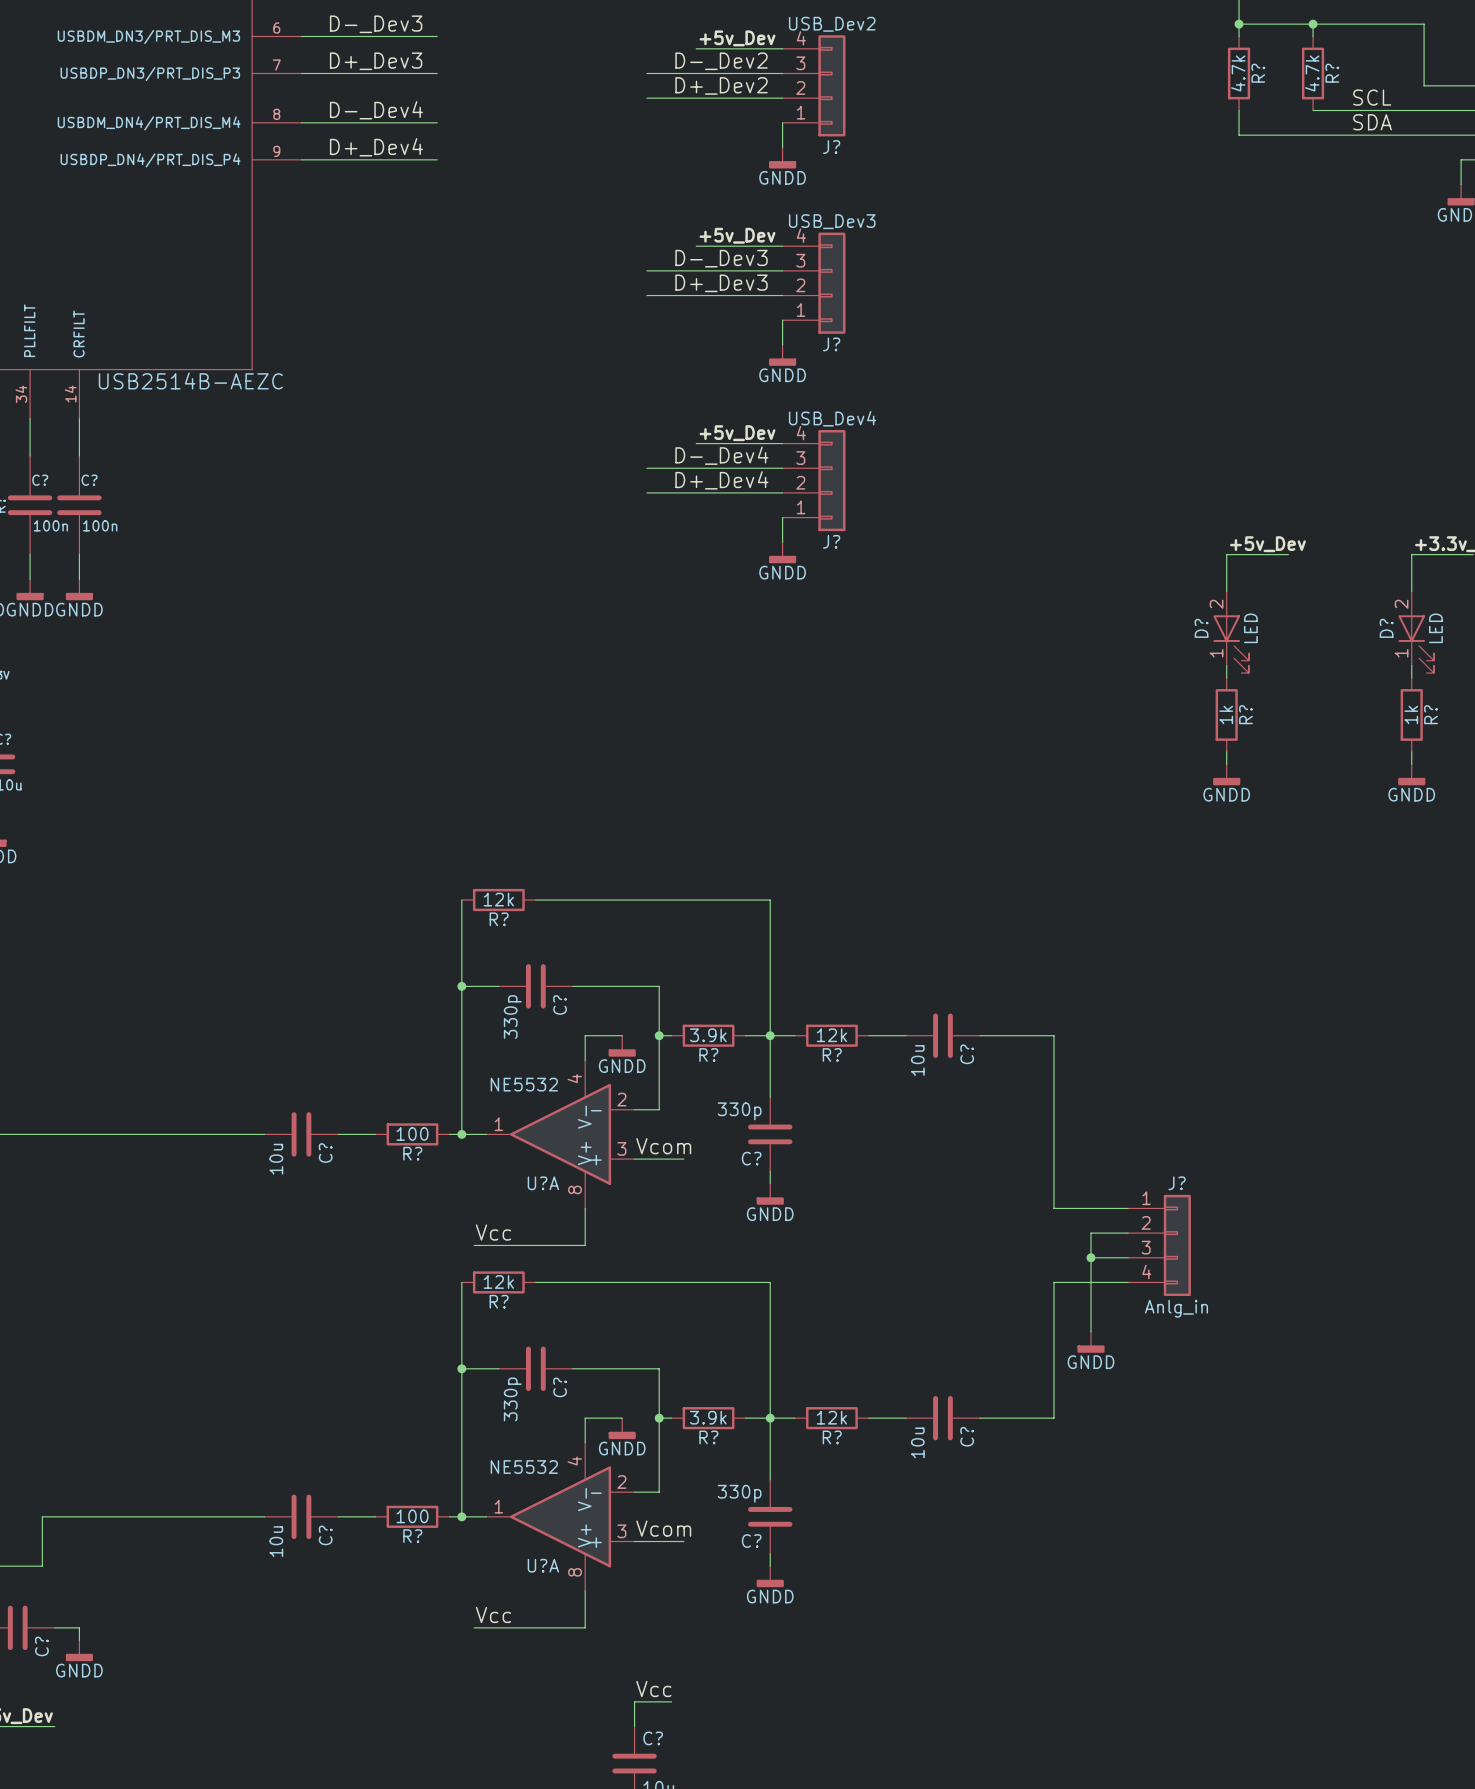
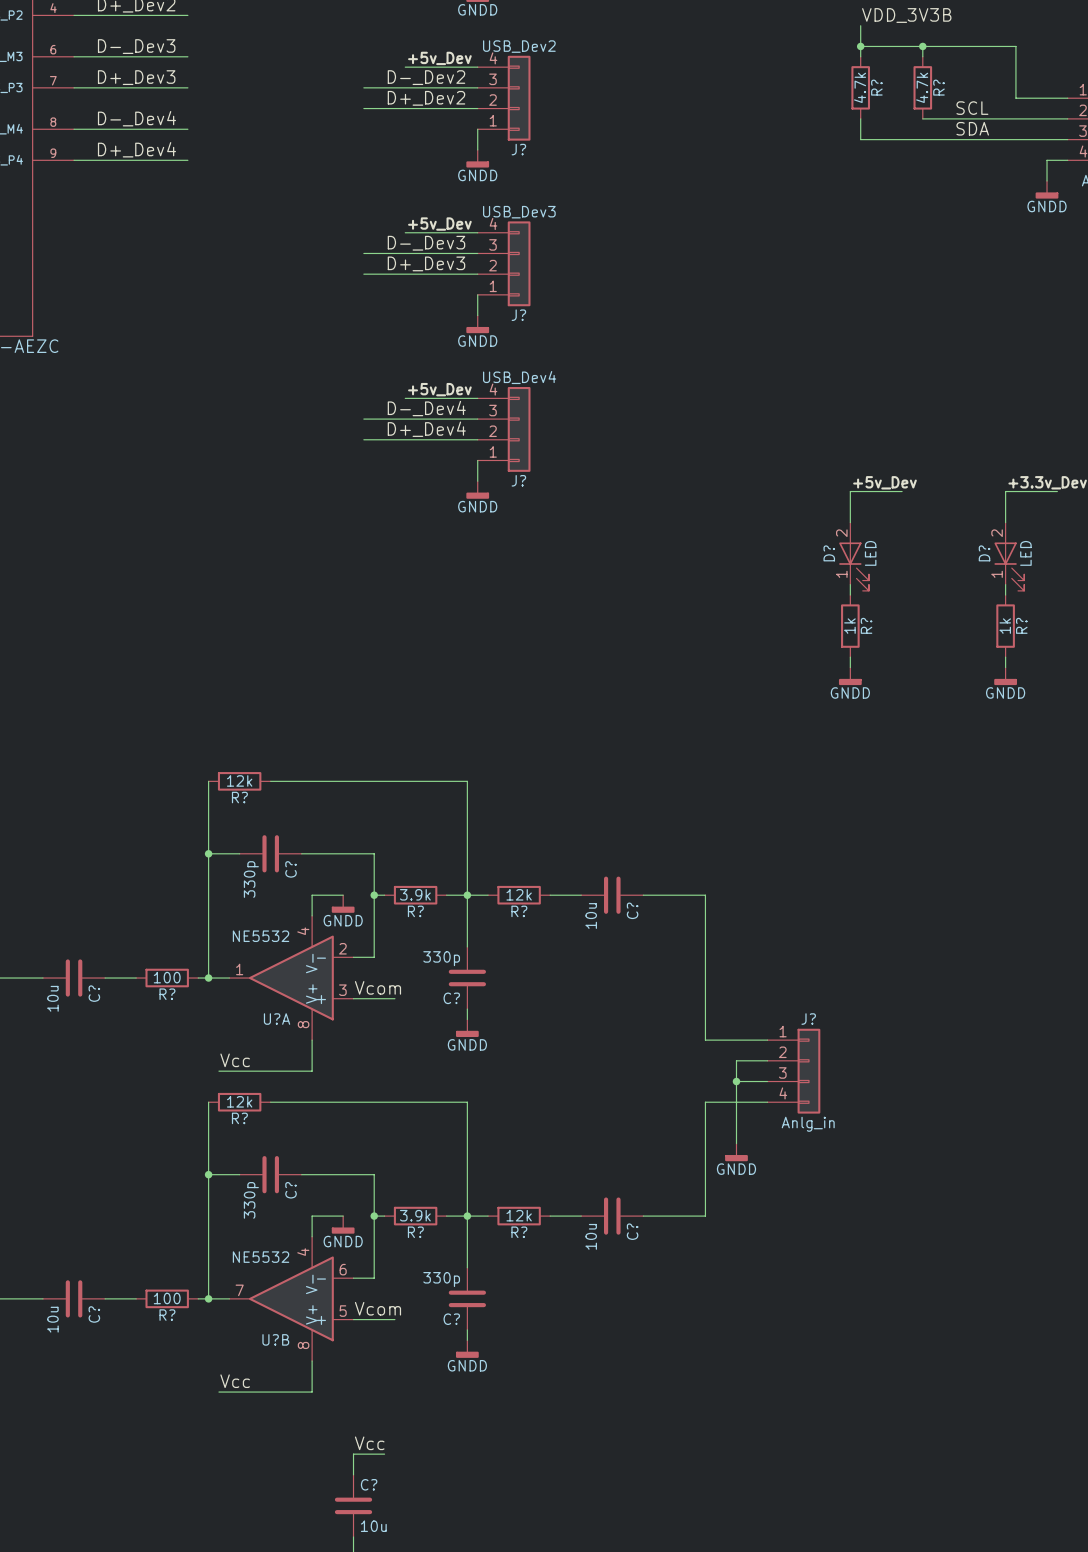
U?A pin number: 2 (621, 1481) -> 6 (343, 1269)
U?A pin number: 1 (498, 1506) -> 7 (239, 1290)
U?A pin number: 3 (621, 1531) -> 5 (343, 1311)
U?A name: U?A (543, 1565) -> U?B (275, 1339)

